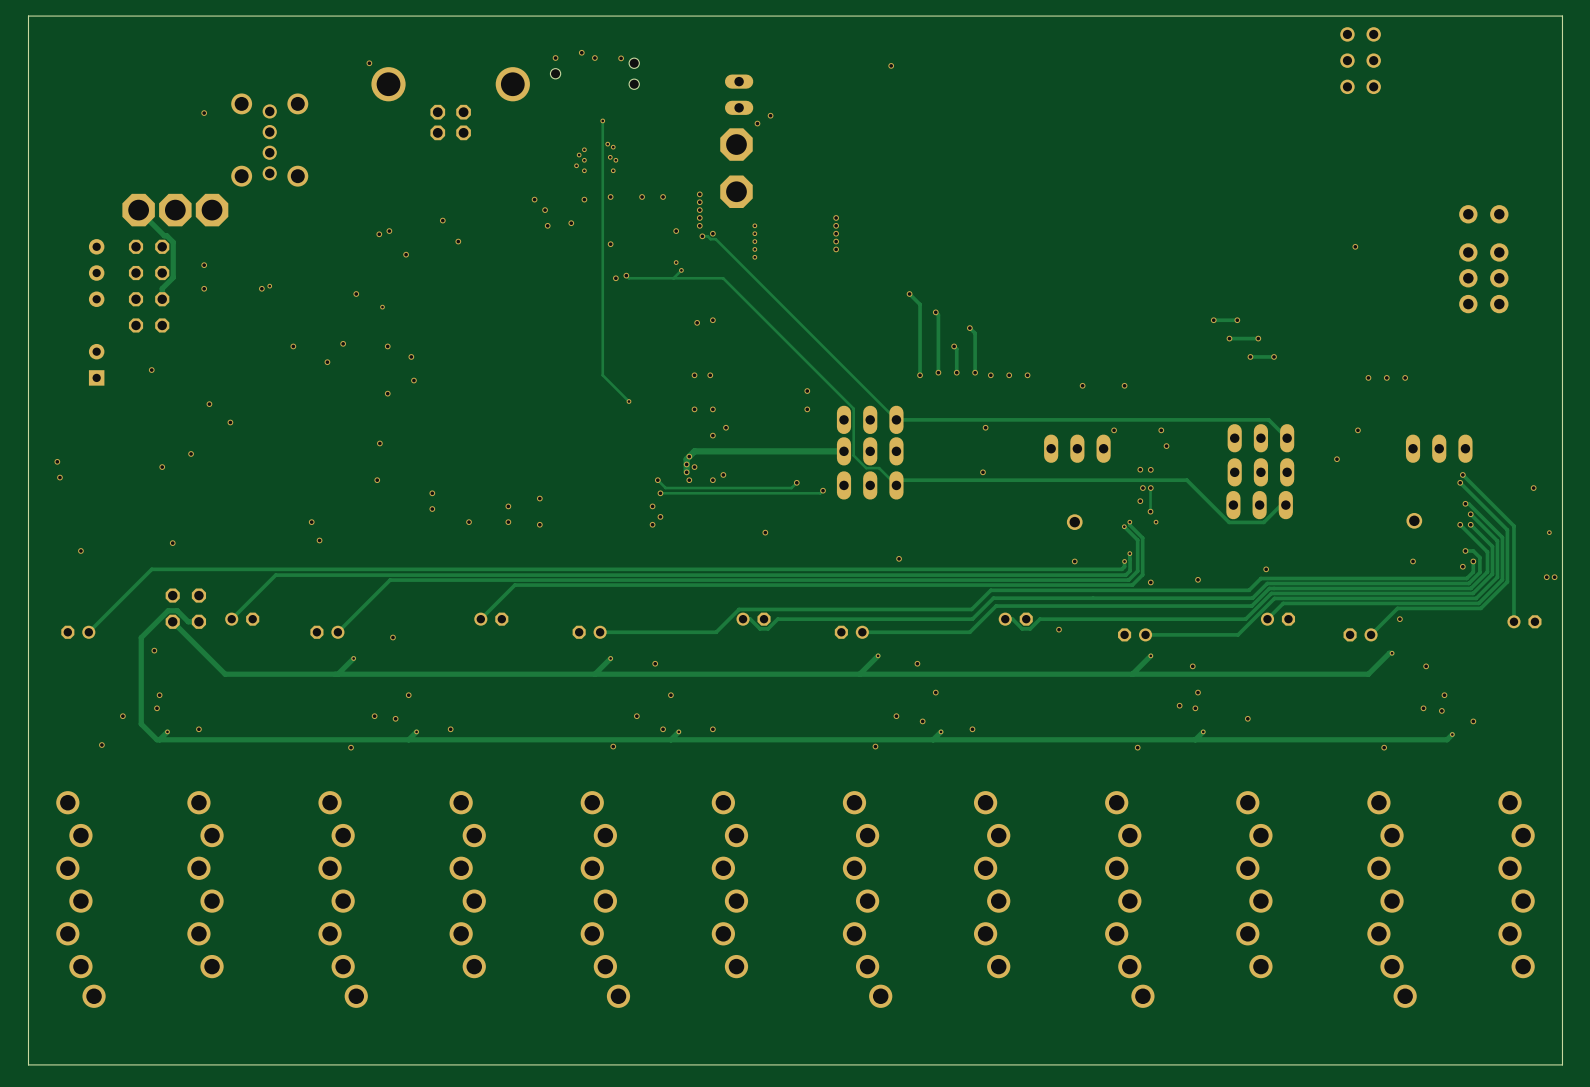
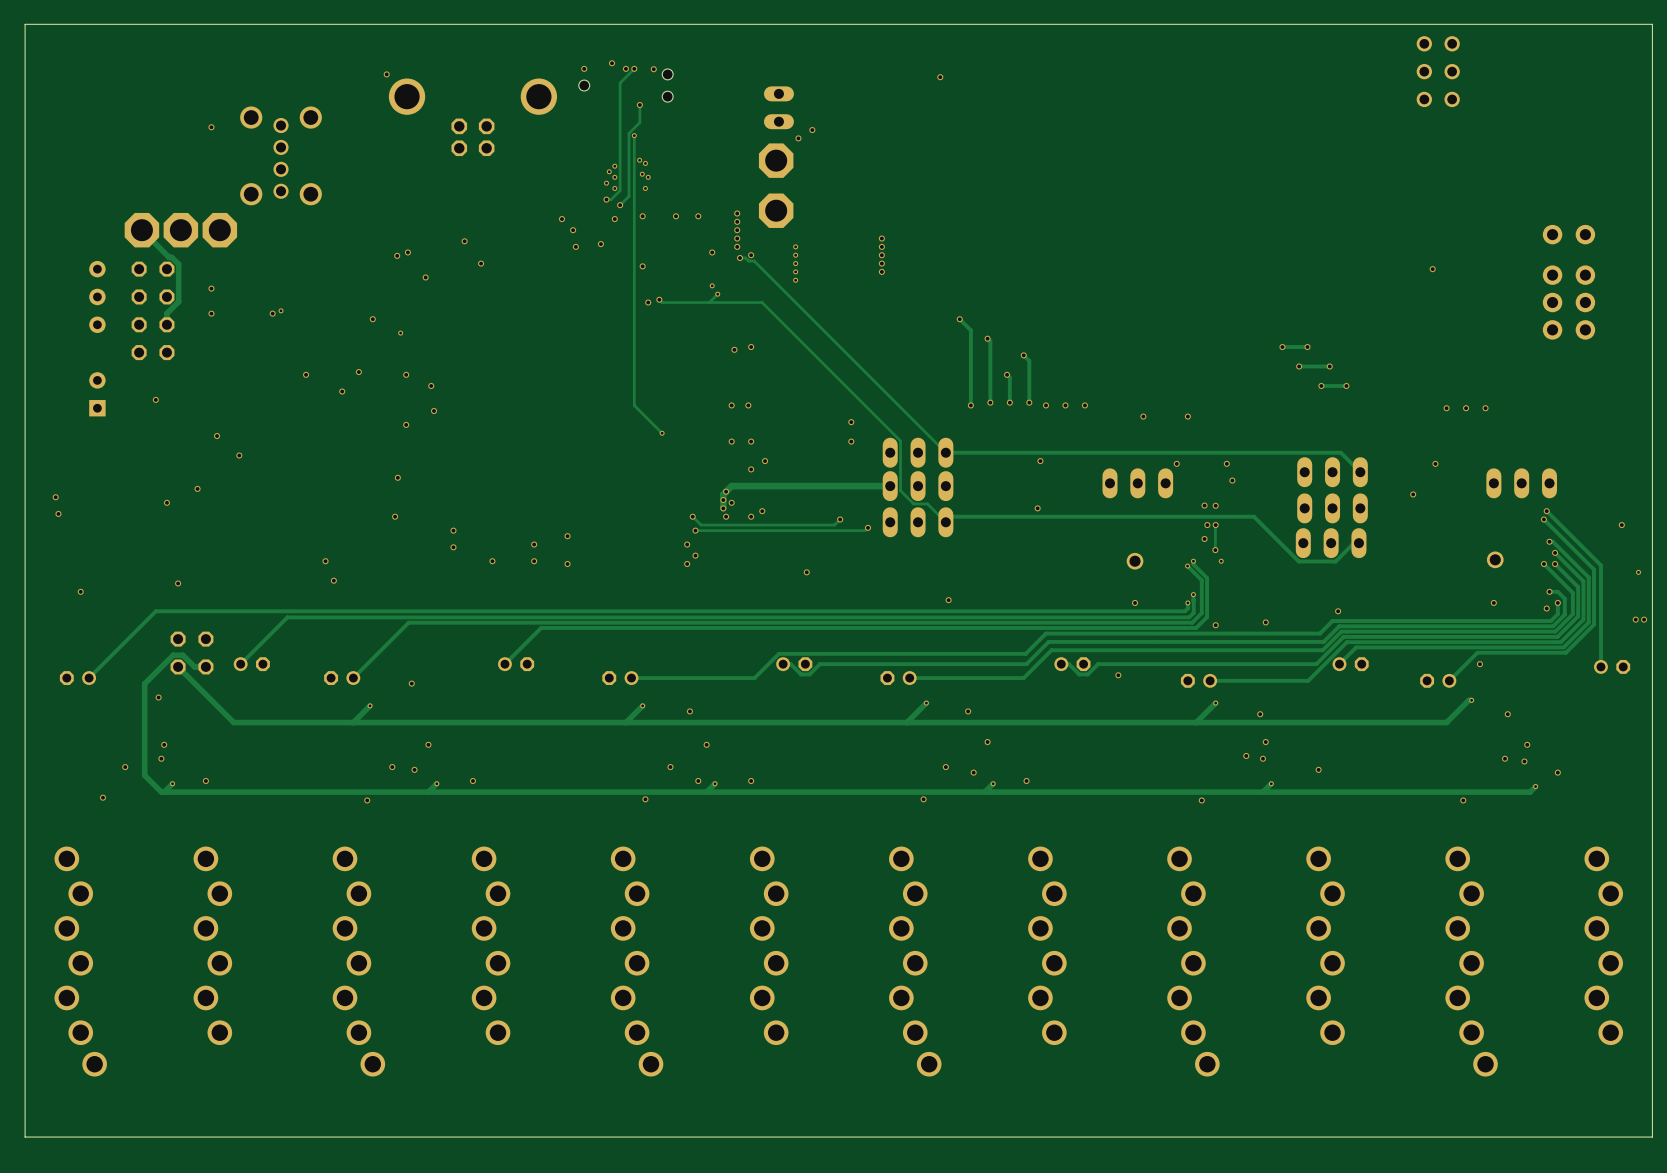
track: none -> (634, 68) (620, 83) (620, 190) (611, 199) (606, 199)
via: none -> (634, 68)
track: none -> (639, 105) (639, 122) (629, 133) (629, 196) (620, 205)
via: none -> (639, 105)
via: none -> (606, 199)
via: none -> (620, 205)

